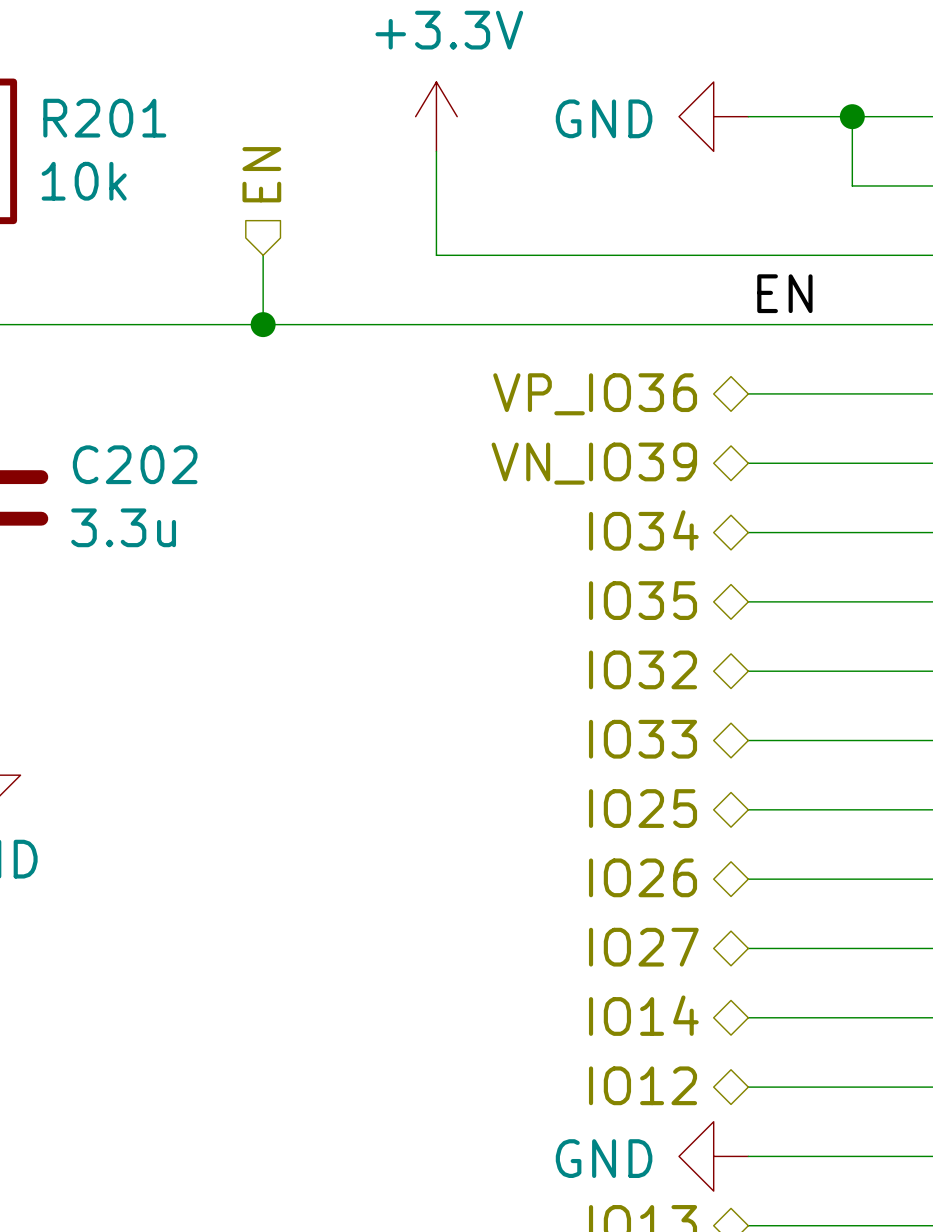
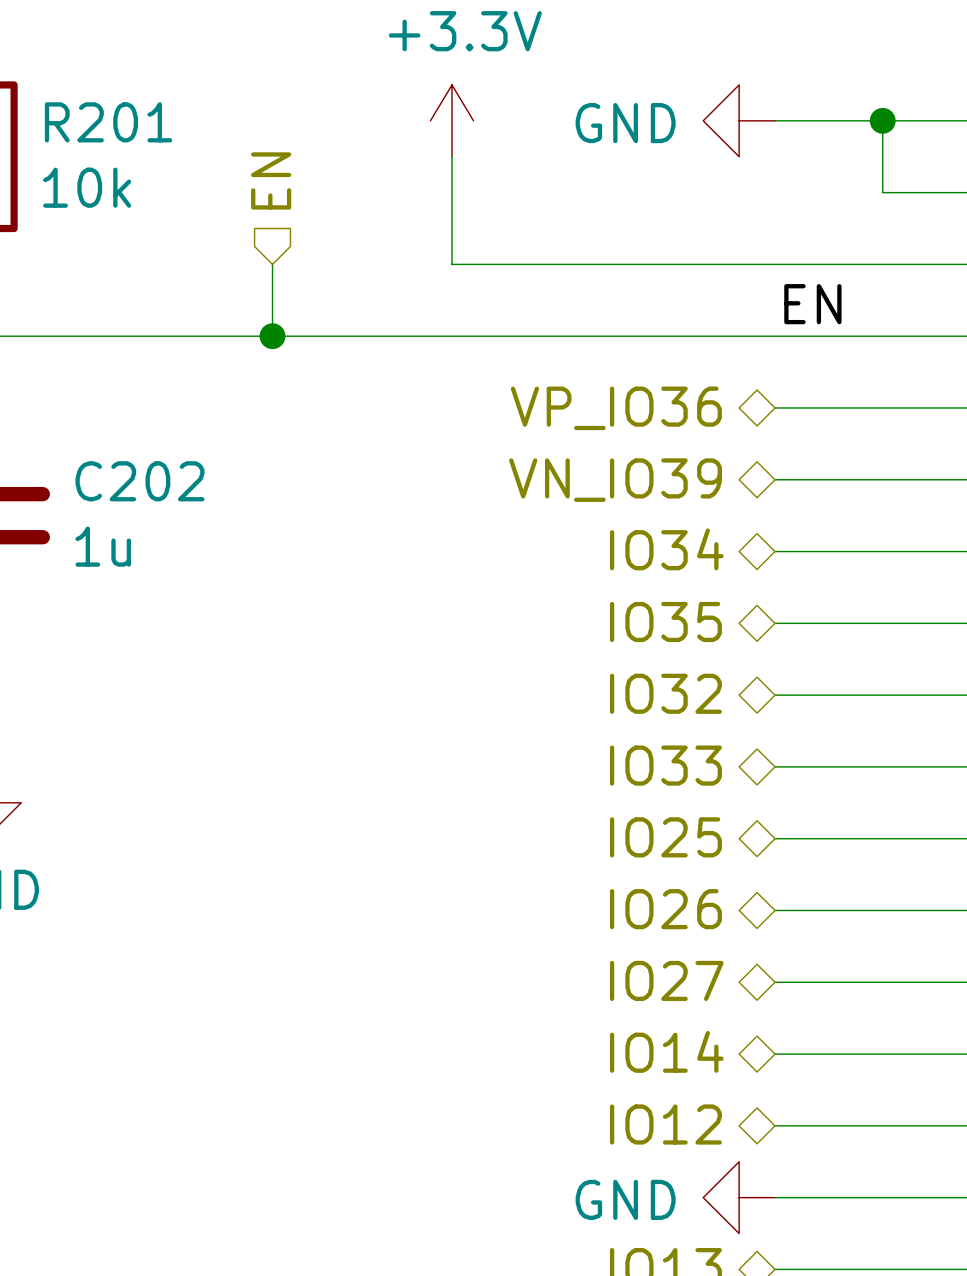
C202 value: 3.3u (123, 527) -> 1u (103, 546)

